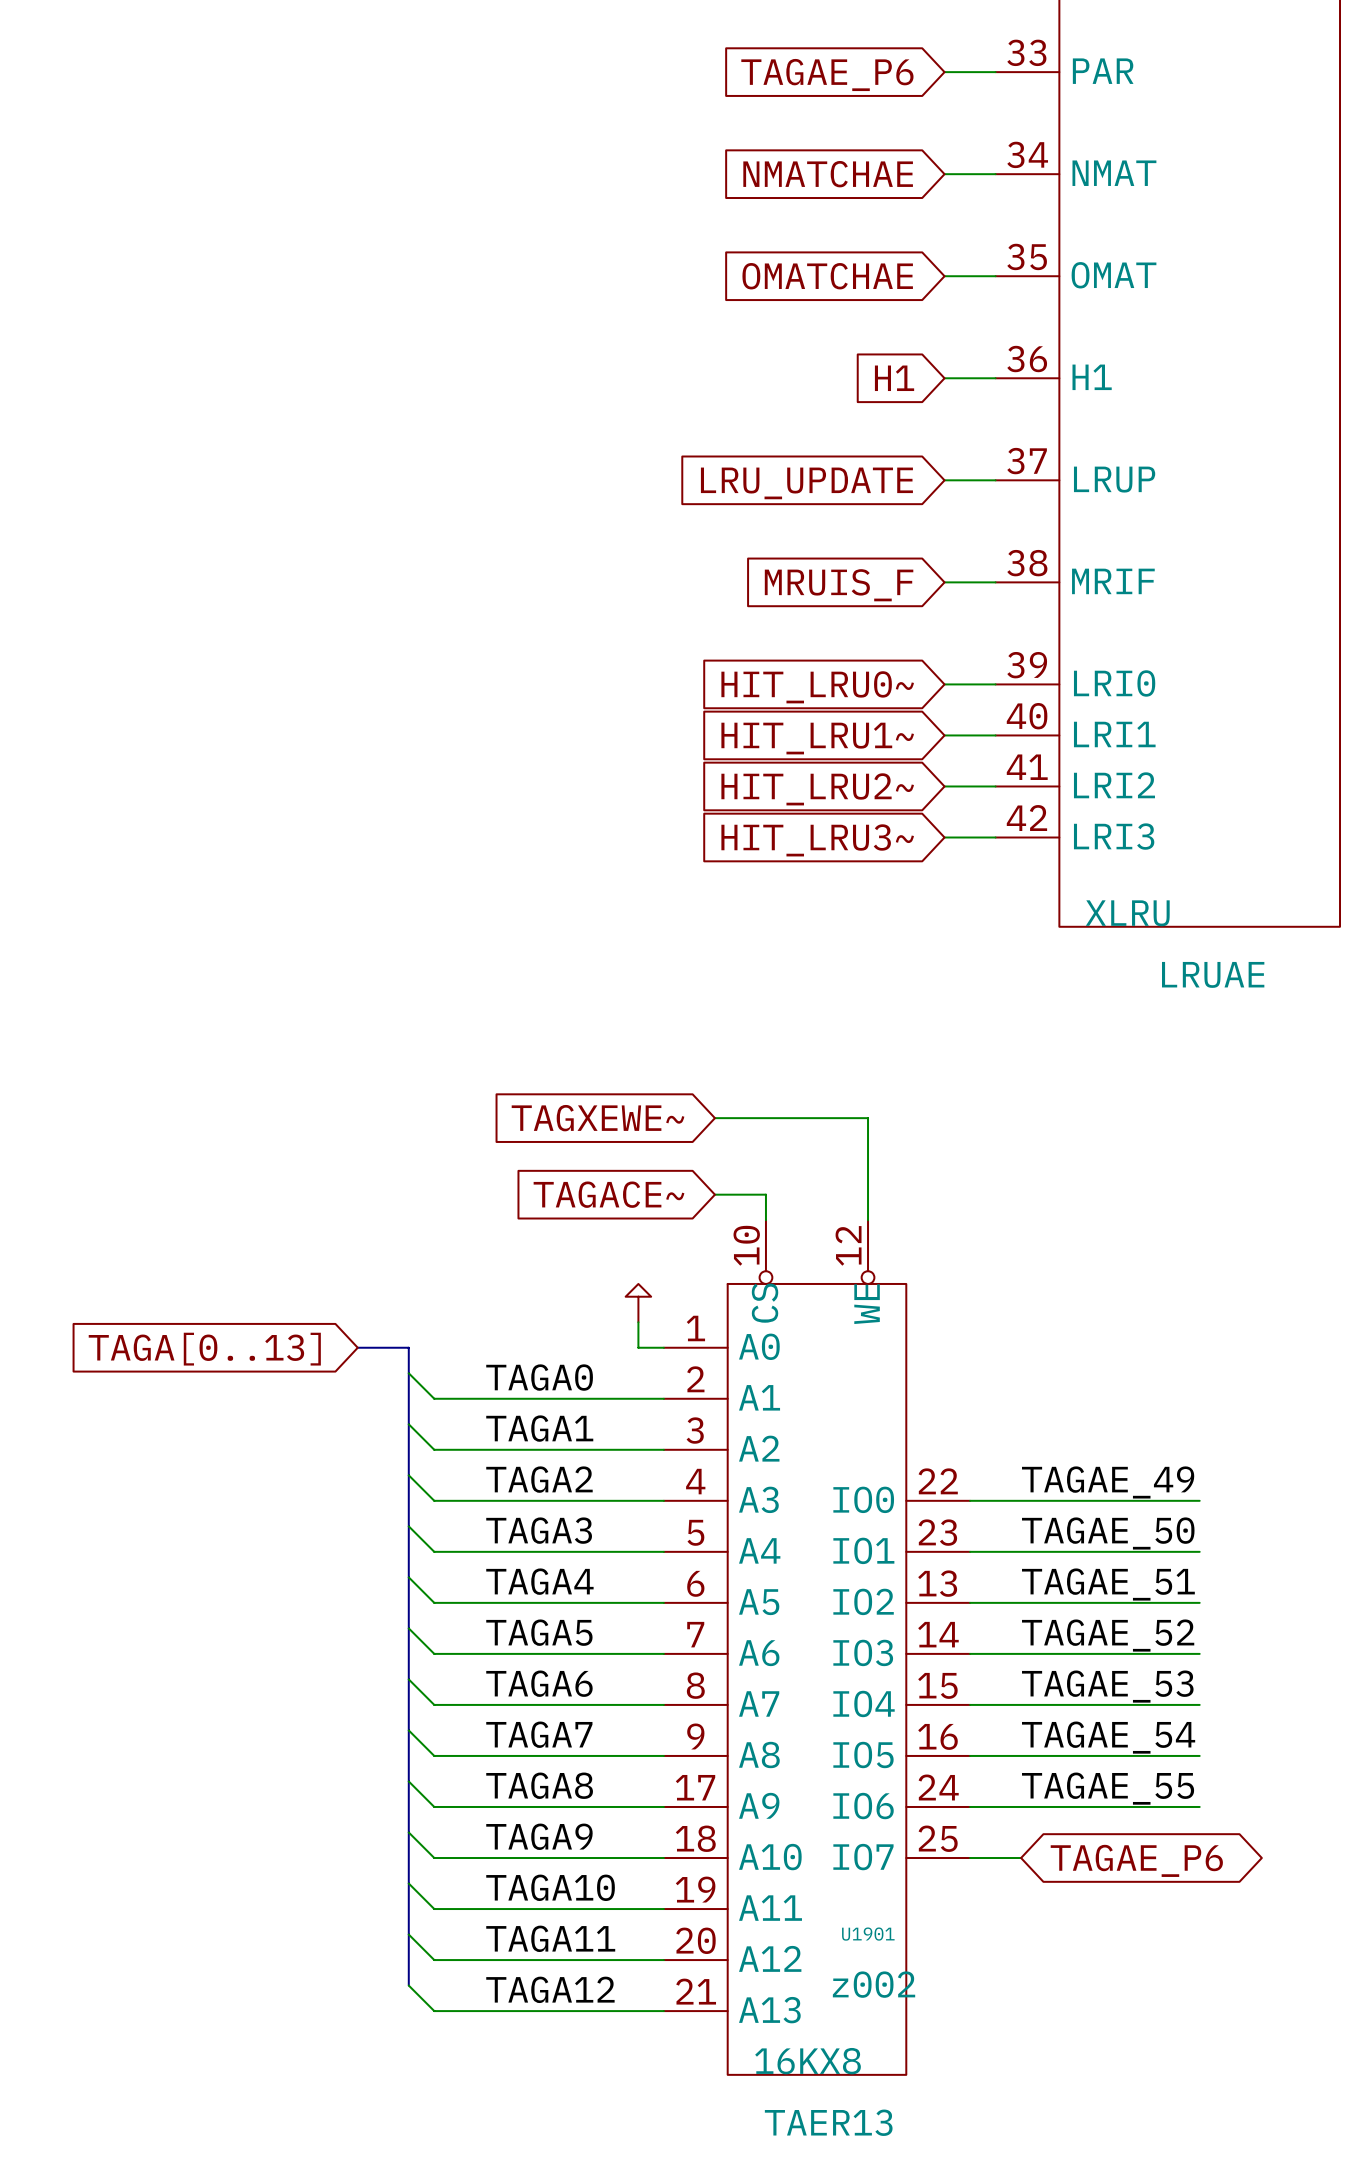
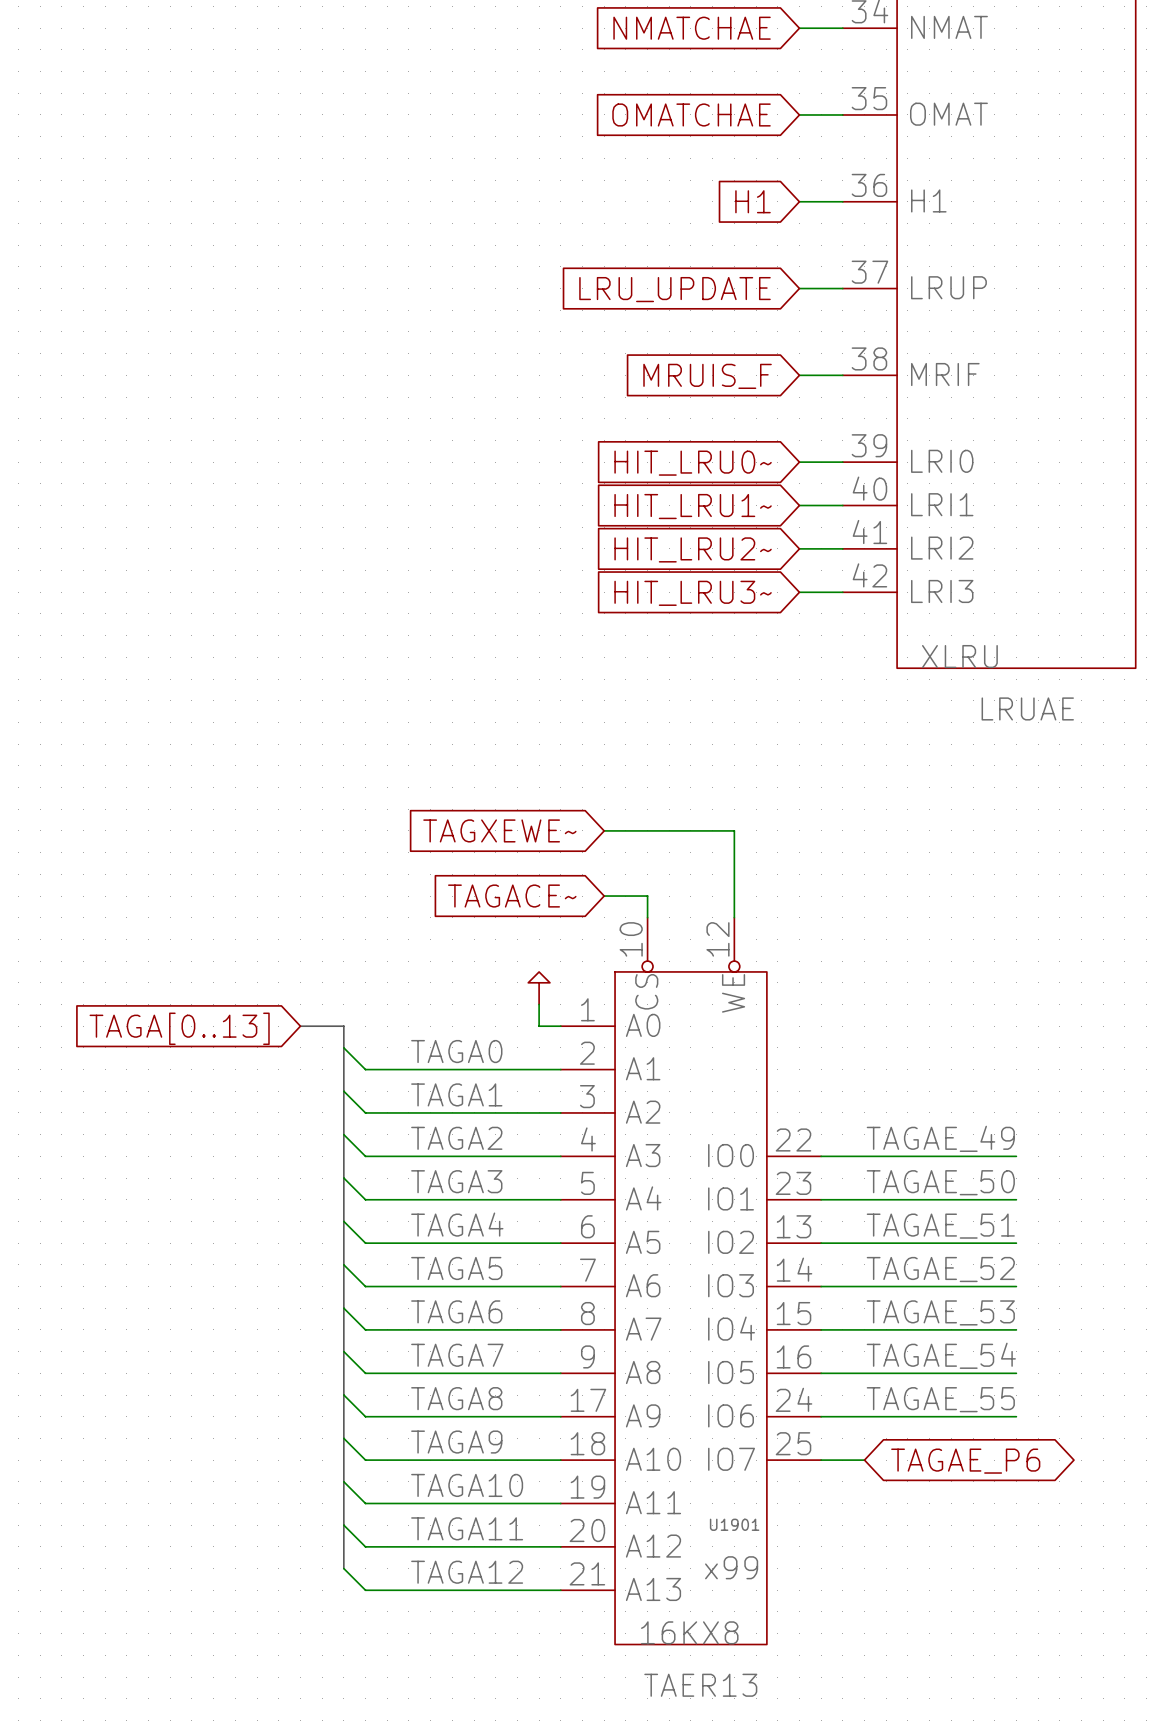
U1901 text: z002 (874, 1984) -> x99 (731, 1567)

